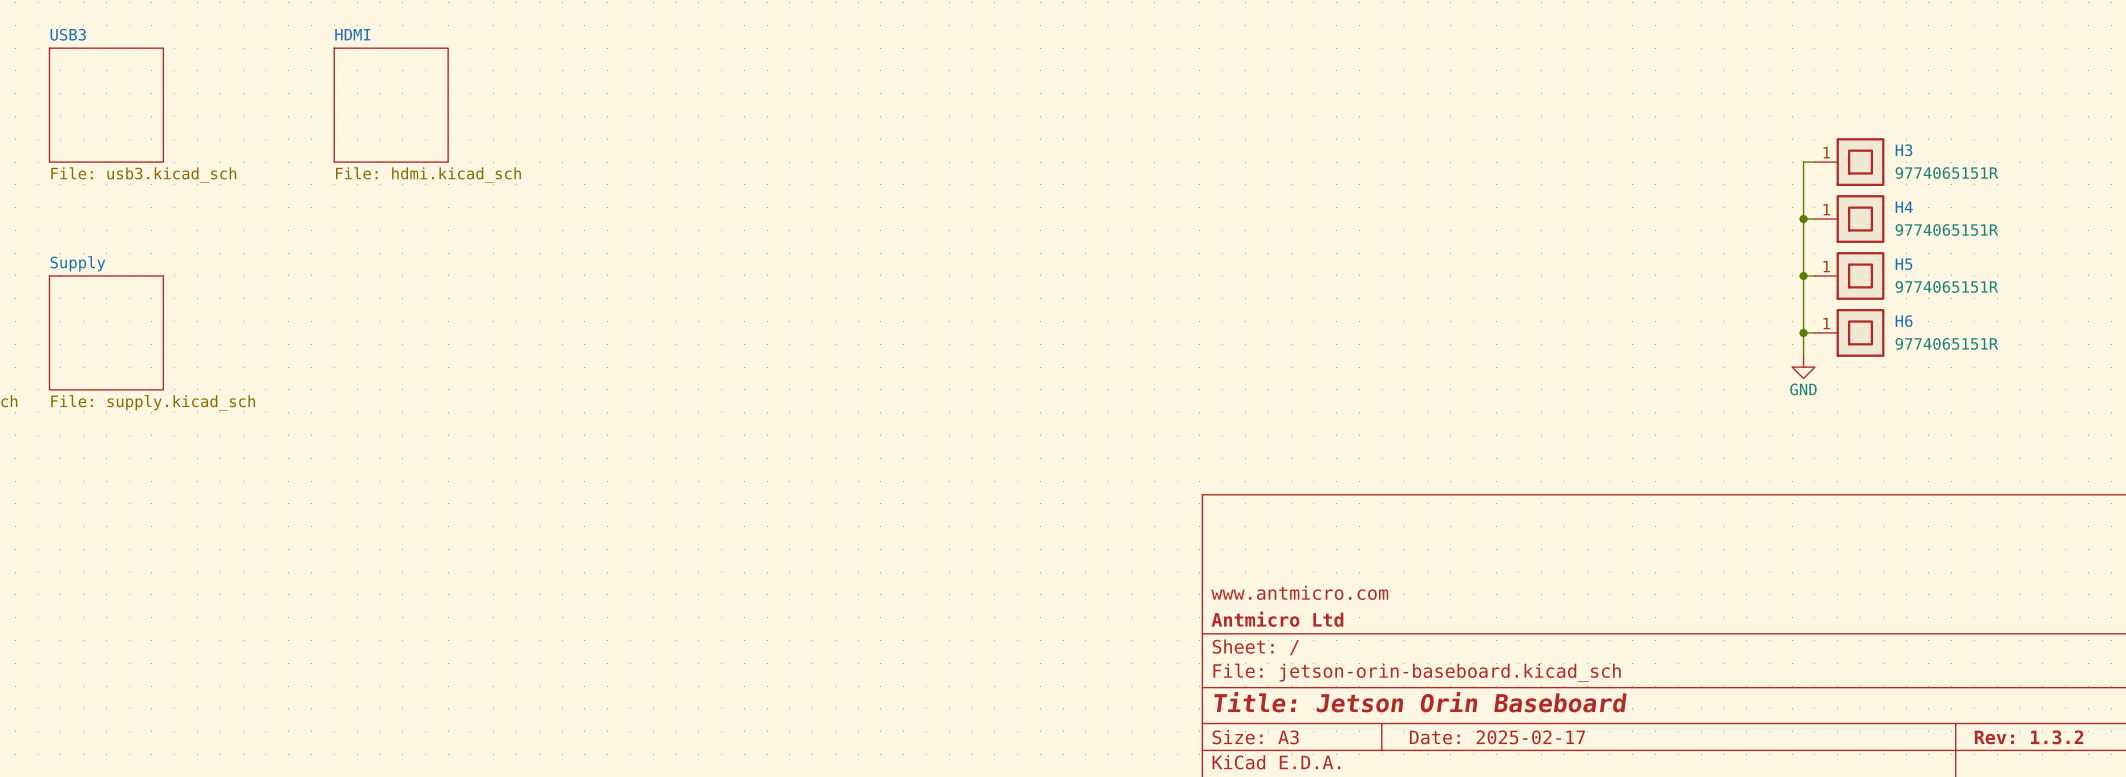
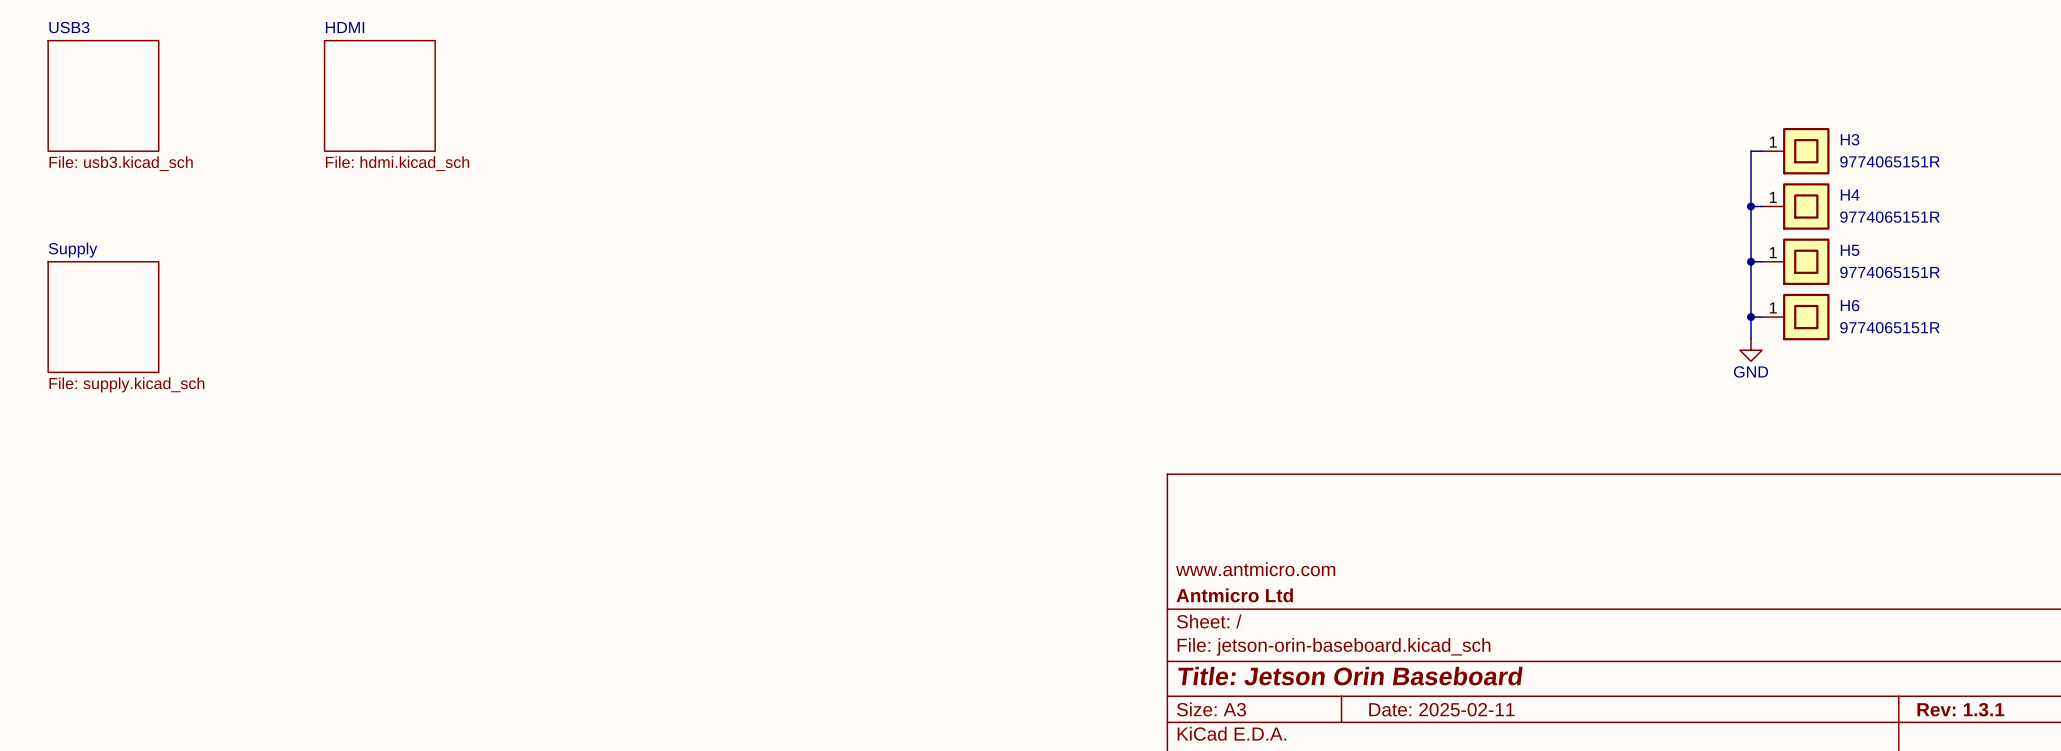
title block: Date: 2025-02-17 (1497, 737) -> Date: 2025-02-11 (1441, 709)
title block: Rev: 1.3.2 (2029, 737) -> Rev: 1.3.1 (1960, 709)

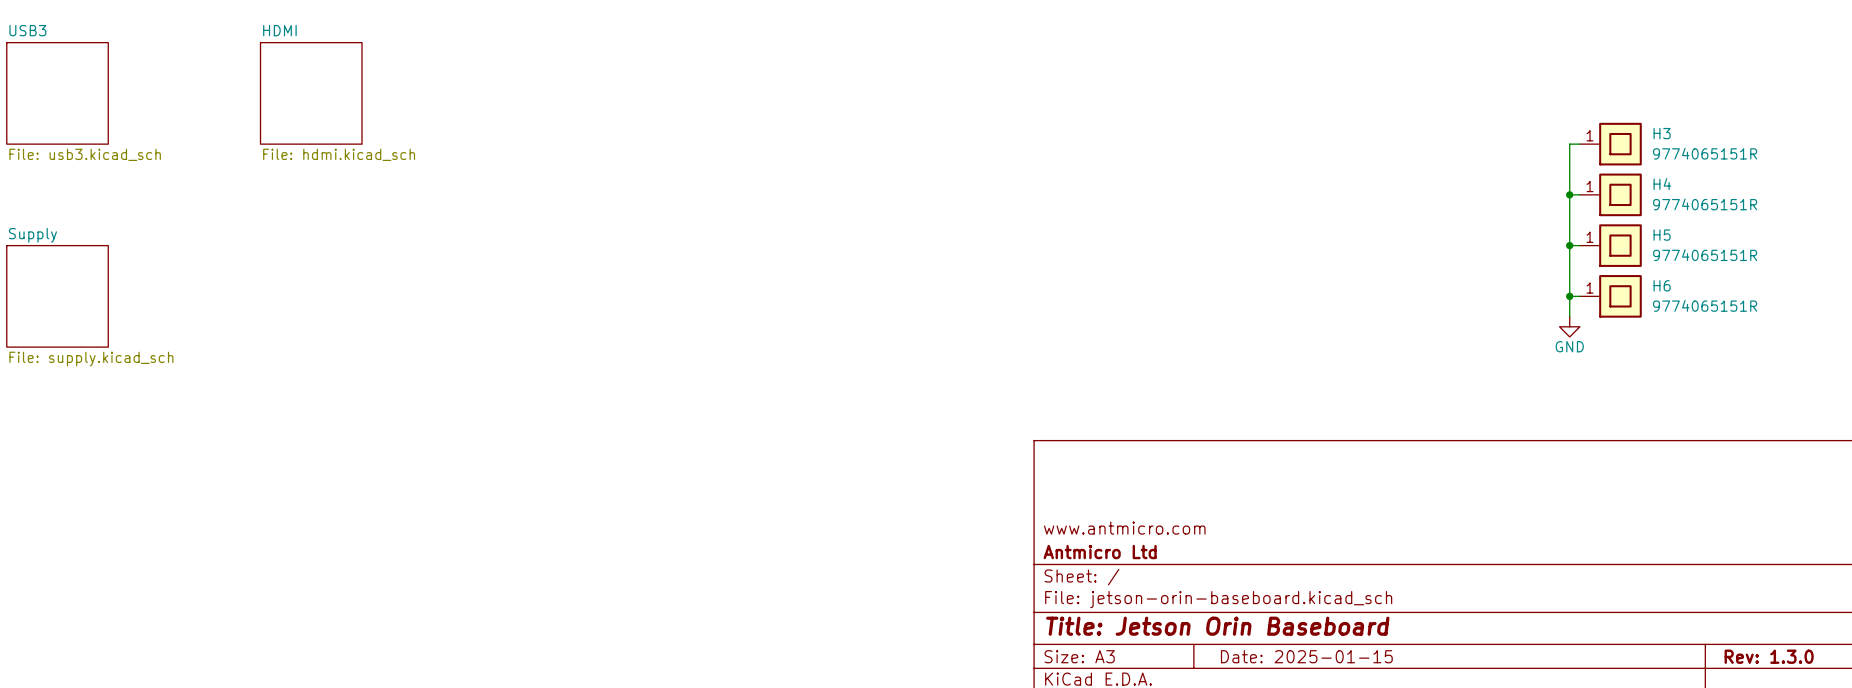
title block: Date: 2025-02-11 (1441, 709) -> Date: 2025-01-15 (1306, 656)
title block: Rev: 1.3.1 (1960, 709) -> Rev: 1.3.0 (1769, 656)

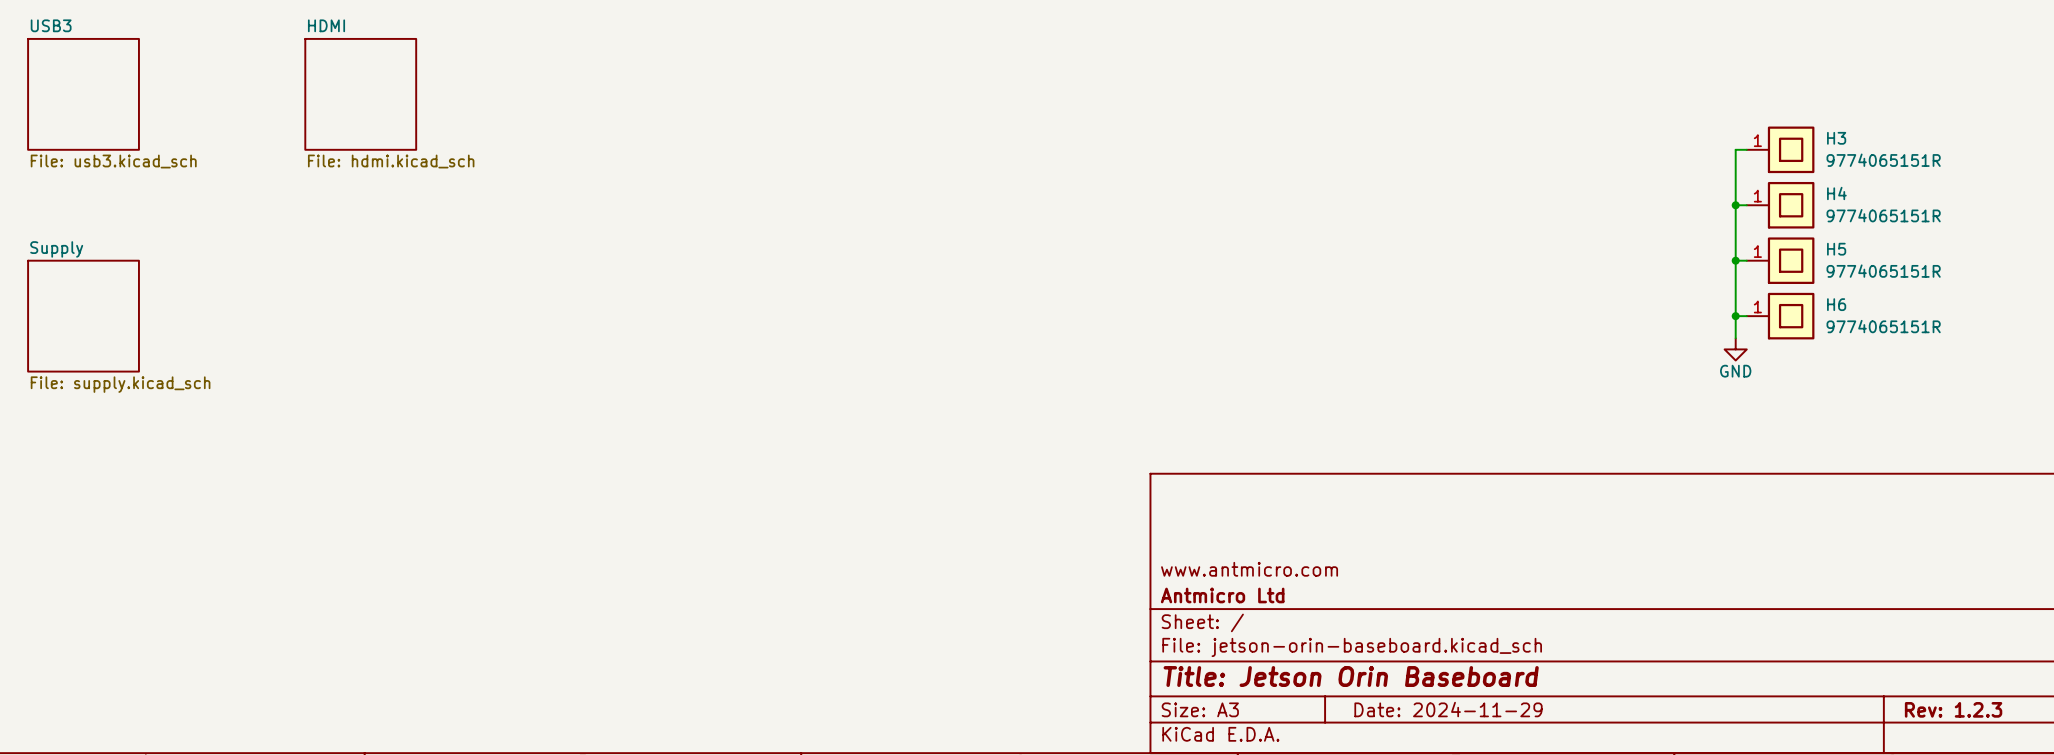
title block: Date: 2025-01-15 (1306, 656) -> Date: 2024-11-29 (1448, 709)
title block: Rev: 1.3.0 (1769, 656) -> Rev: 1.2.3 (1953, 709)

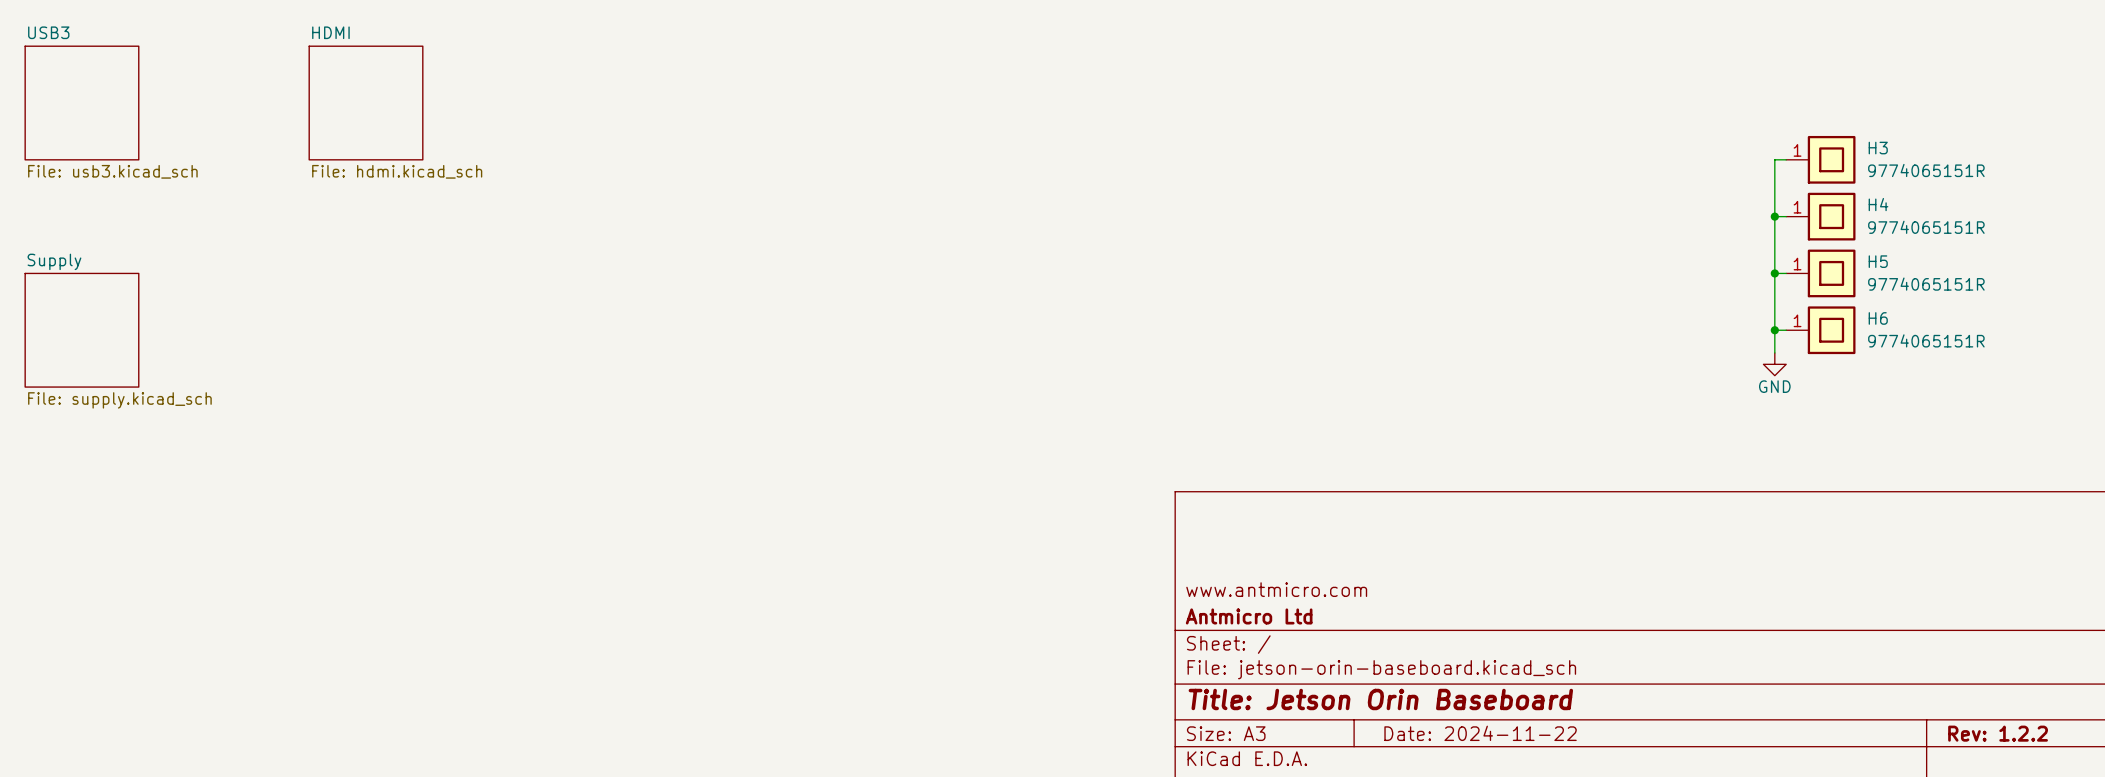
title block: Date: 2024-11-29 (1448, 709) -> Date: 2024-11-22 (1480, 733)
title block: Rev: 1.2.3 (1953, 709) -> Rev: 1.2.2 (1998, 733)

